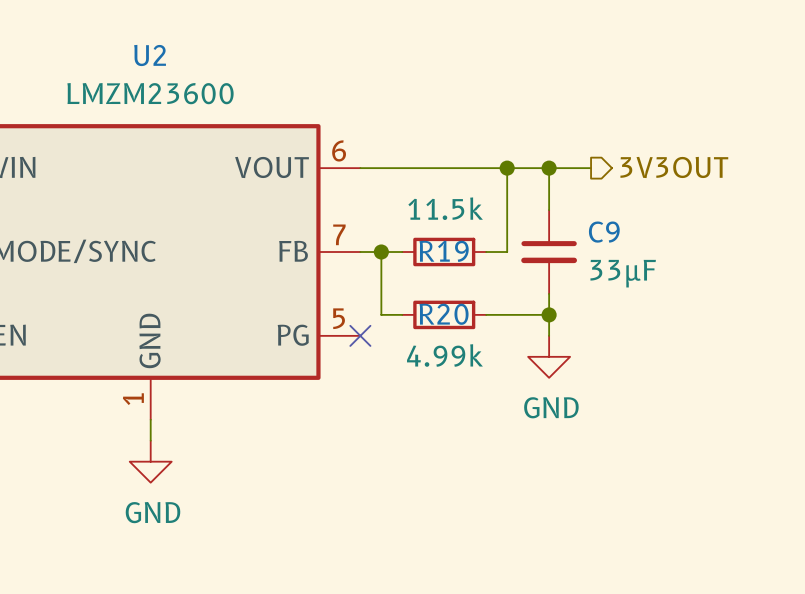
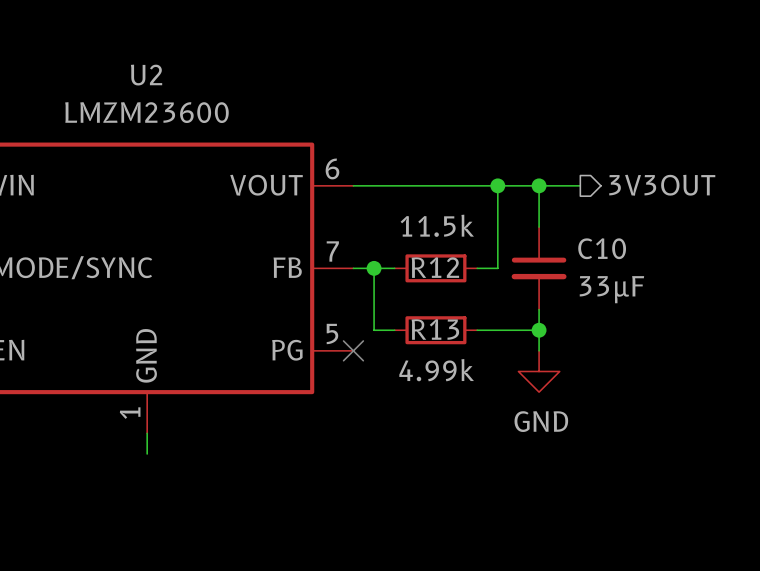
C9 name: C9 (604, 232) -> C10 (602, 248)
R19 name: R19 (444, 251) -> R12 (435, 267)
R20 name: R20 (444, 314) -> R13 (435, 329)
power symbol: GND (150, 461) -> none

